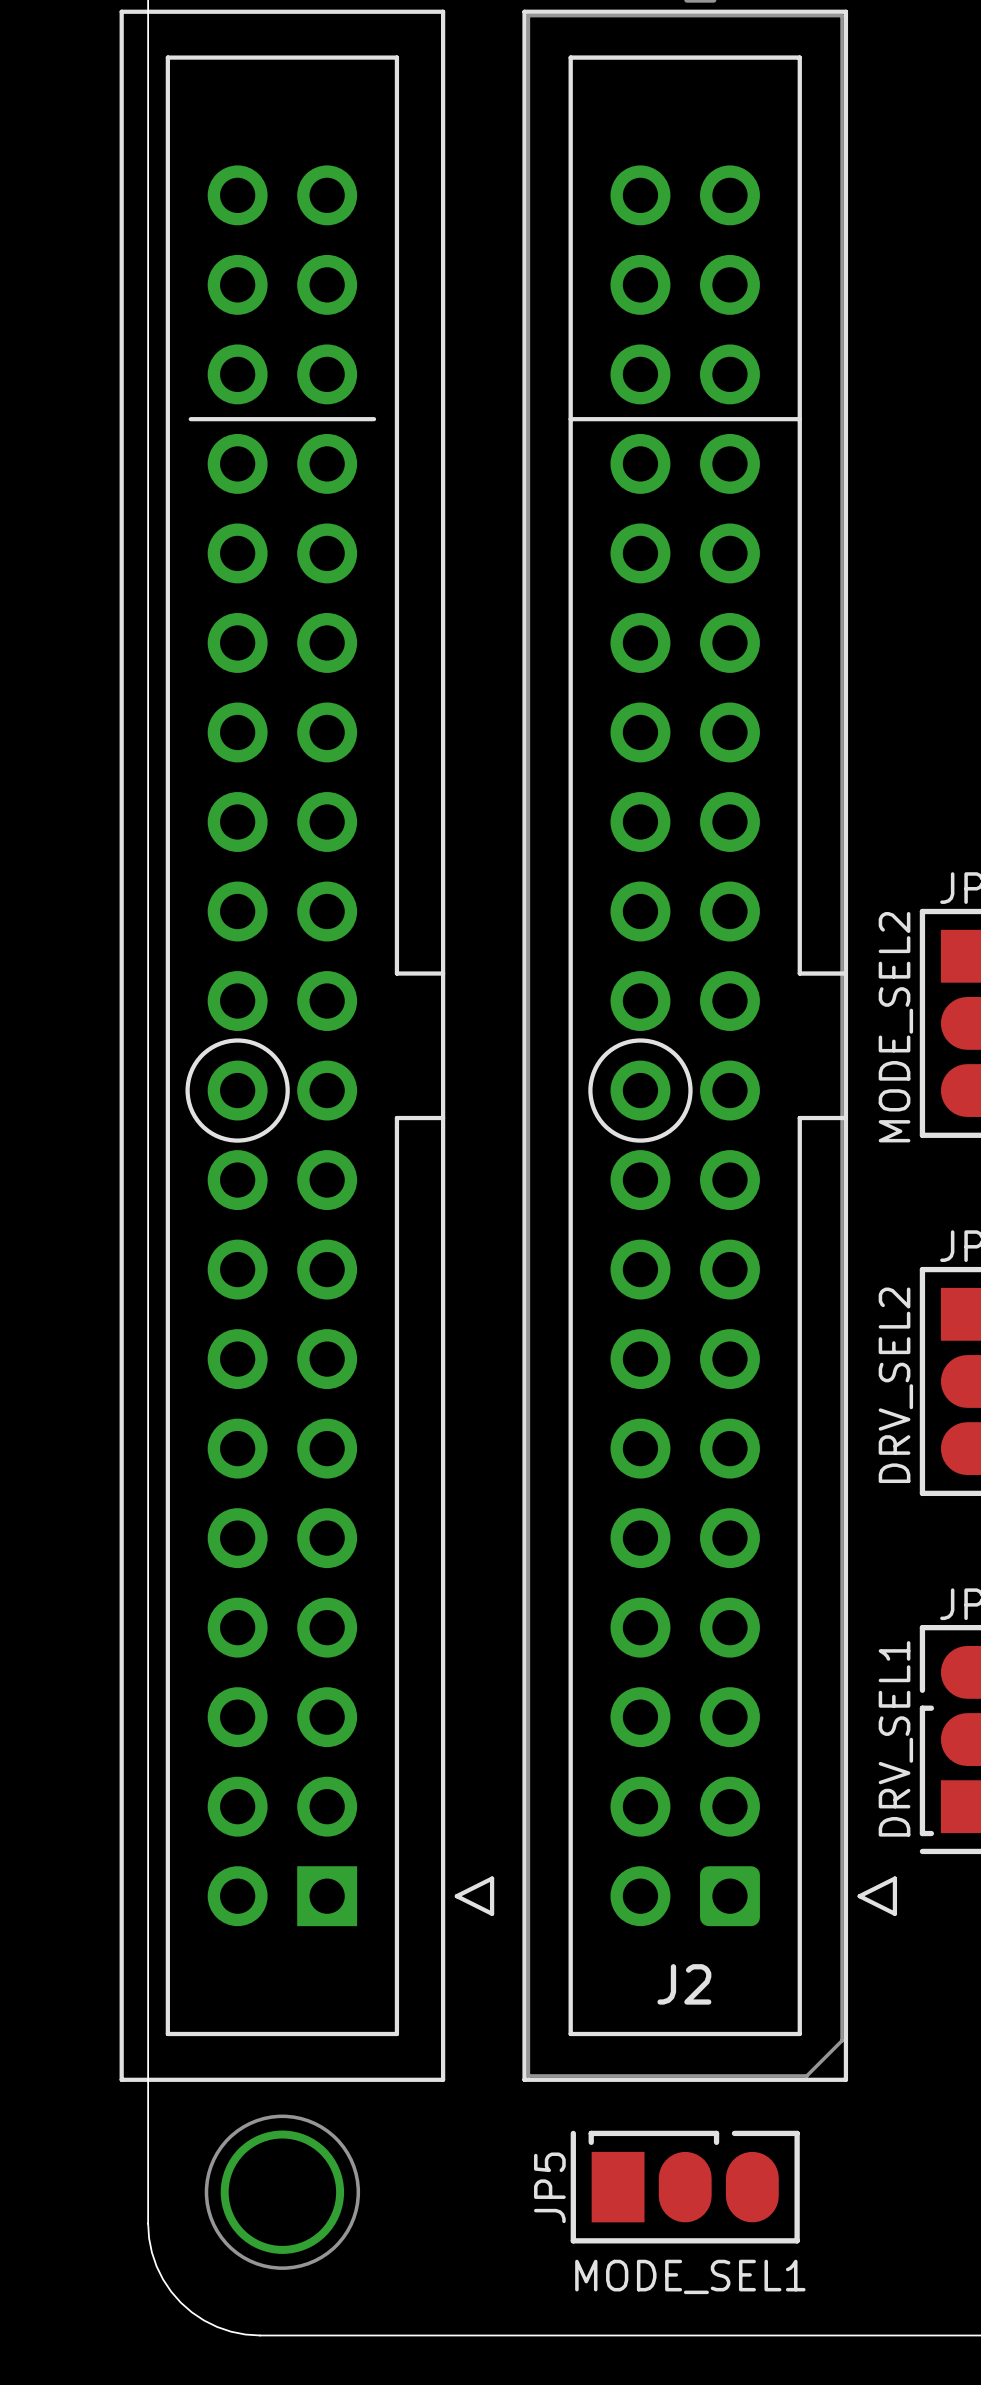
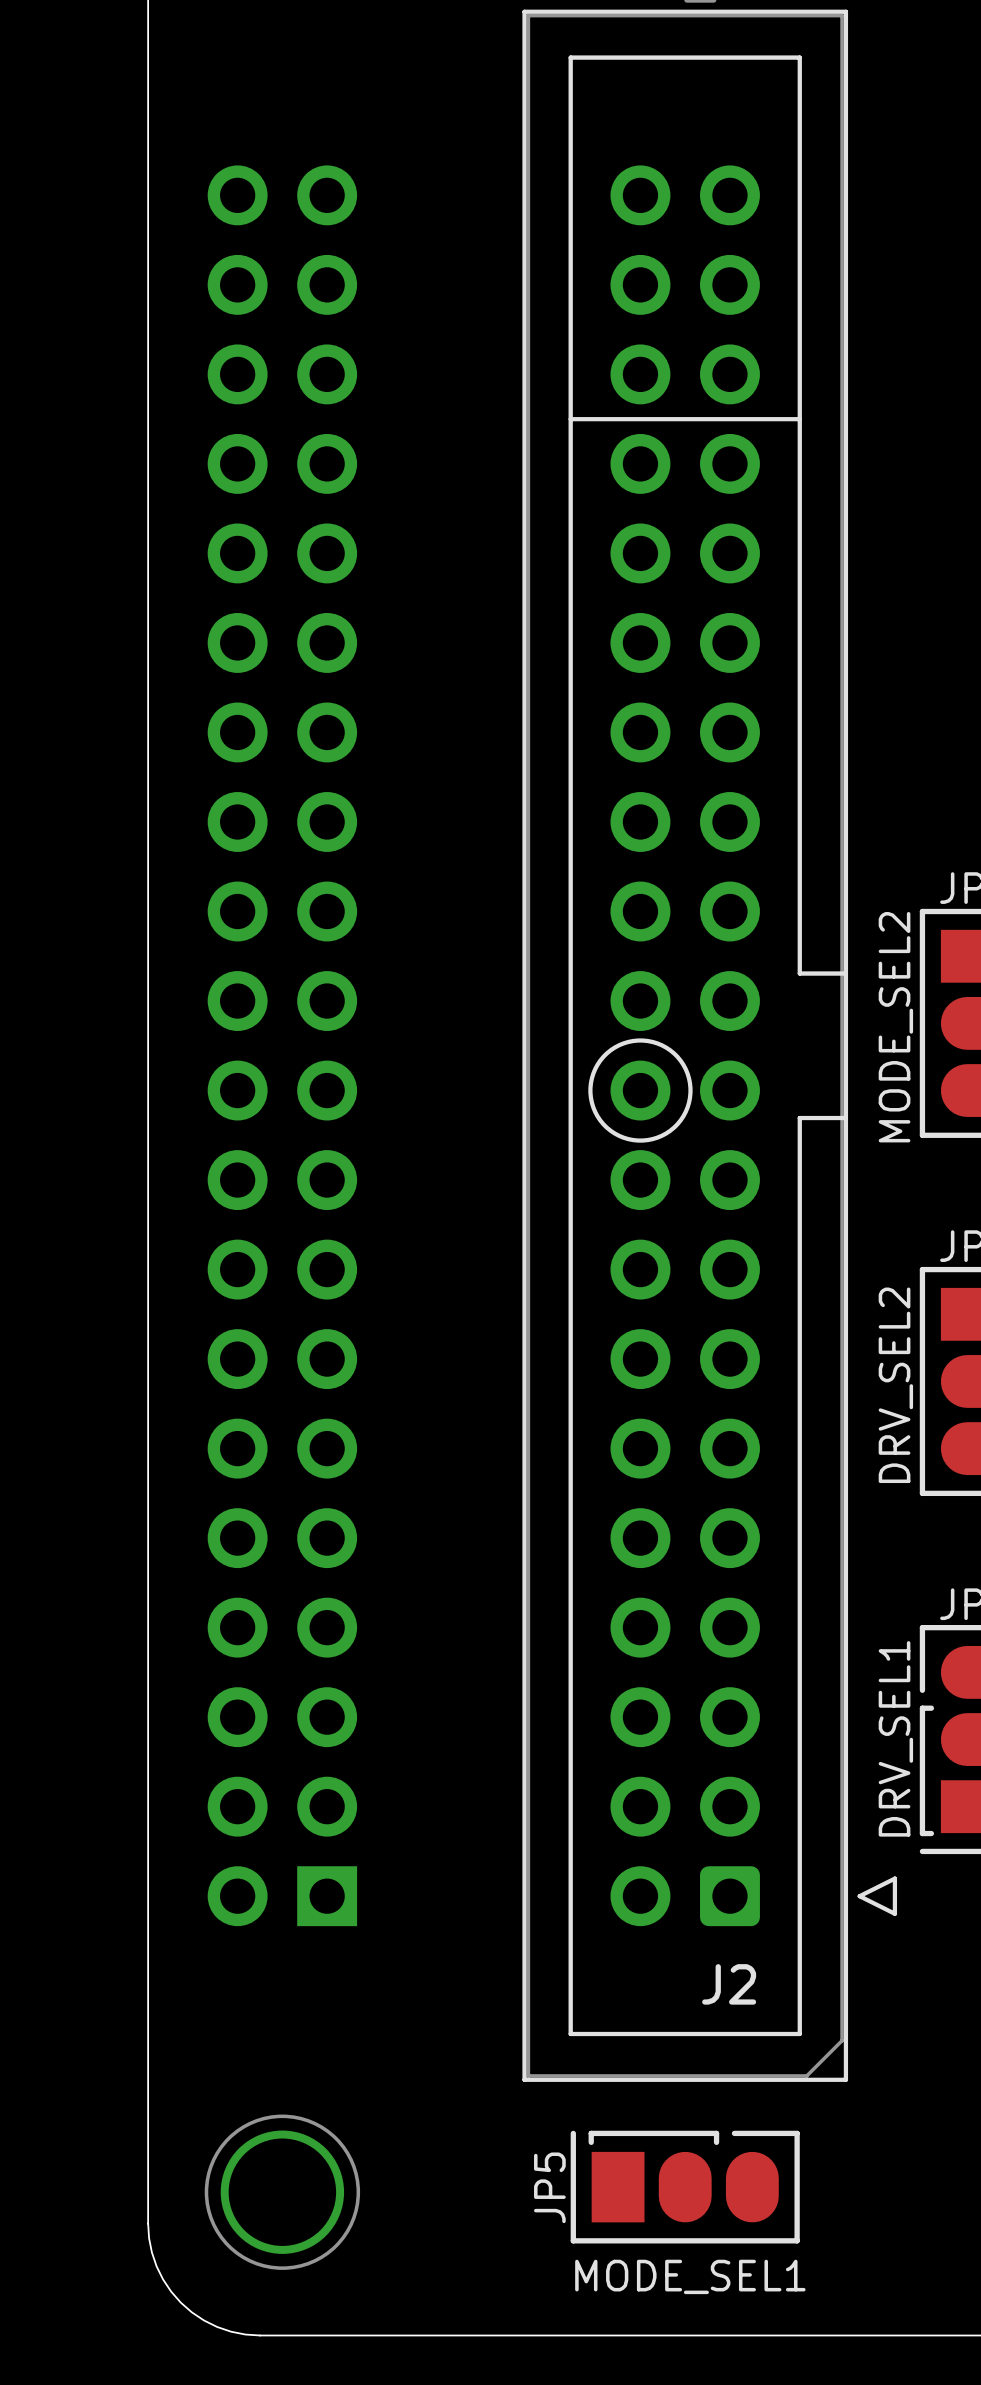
part footprint: [119, 9, 495, 2082] -> [207, 165, 358, 1927]
J2 name position: J2 (684, 1984) -> J2 (729, 1984)

